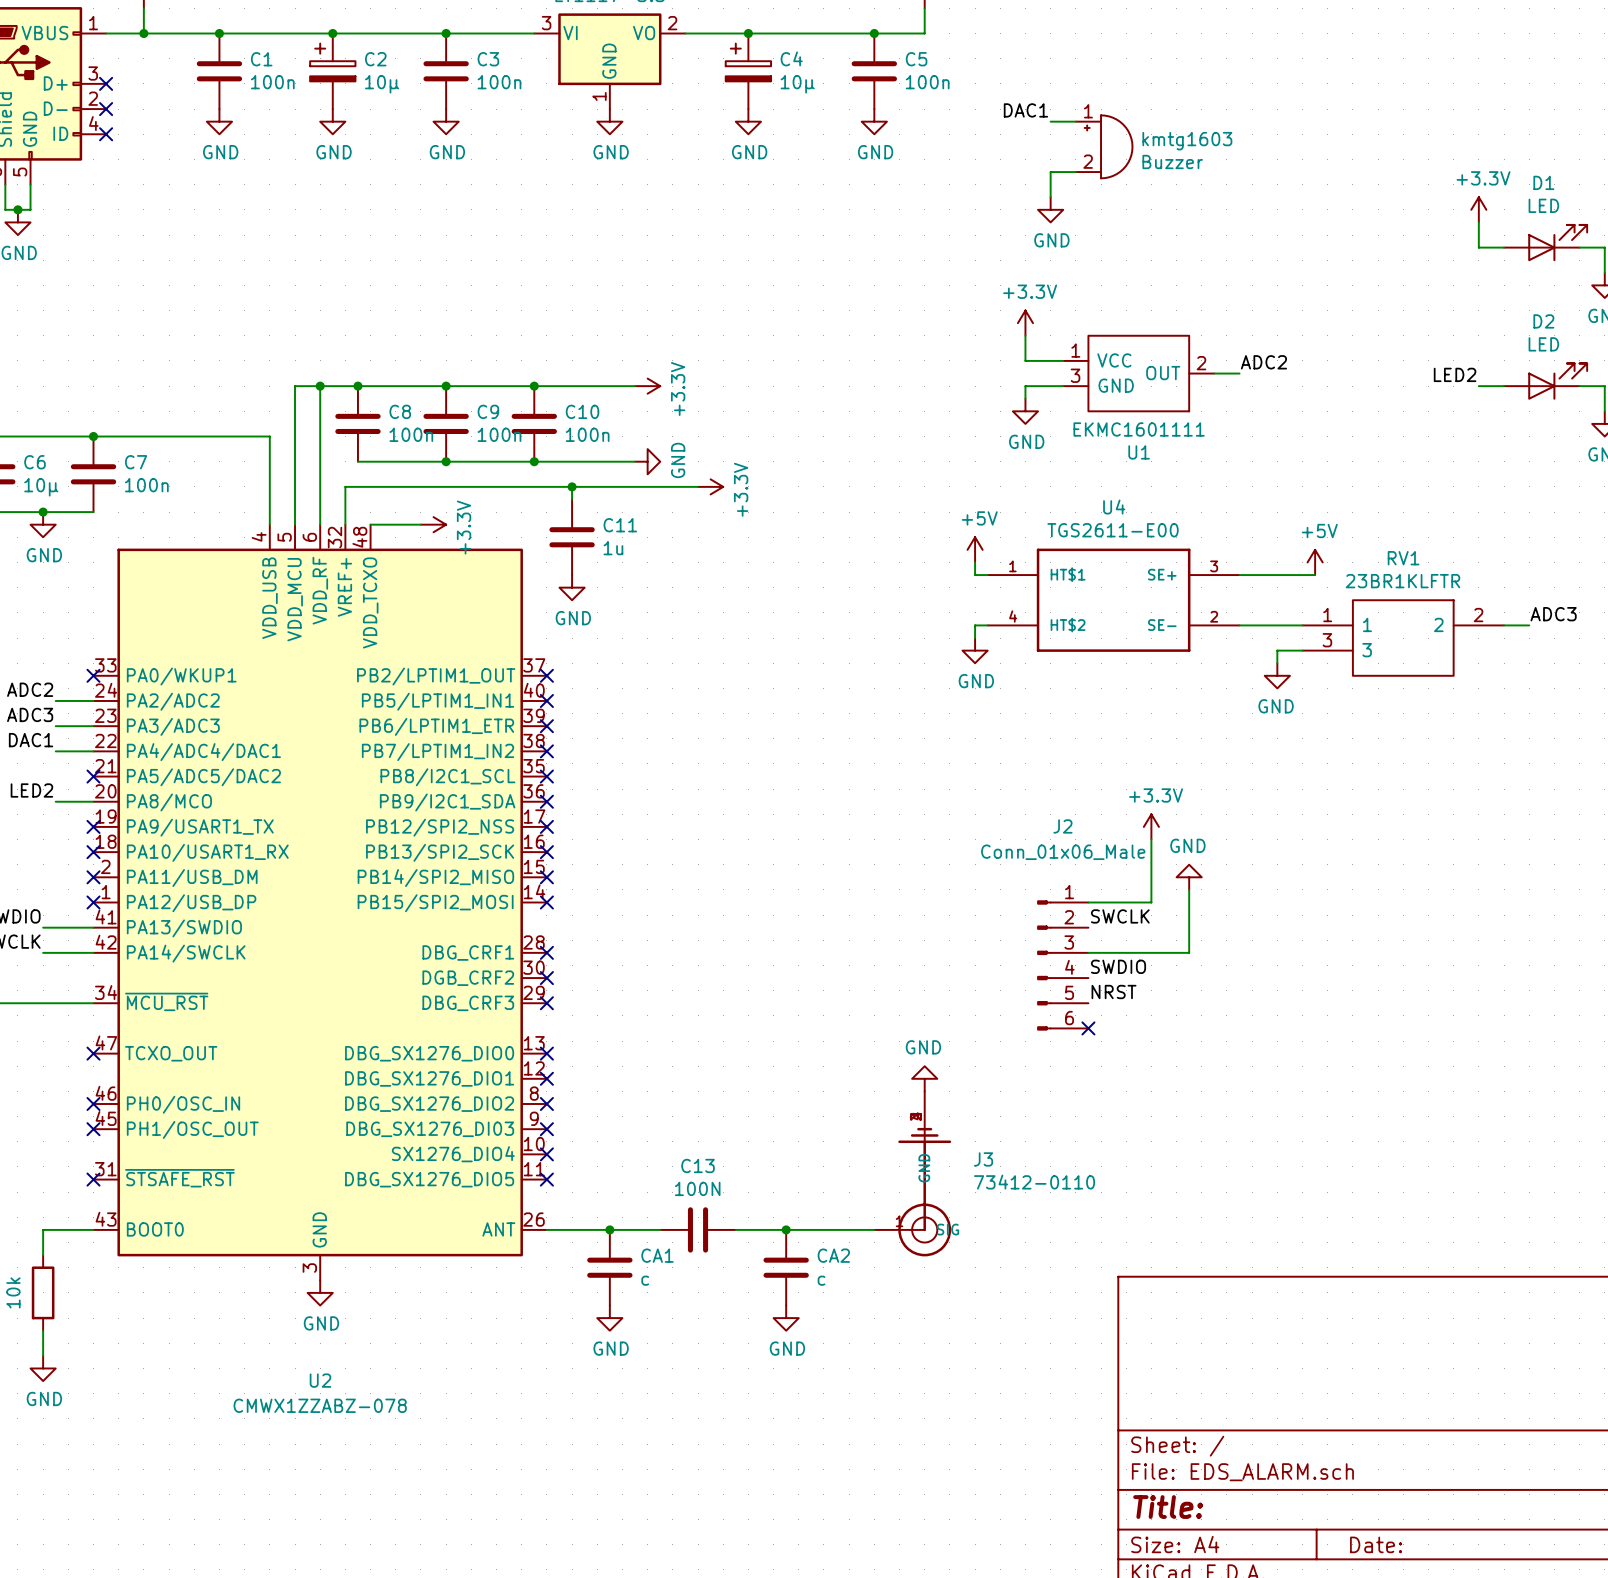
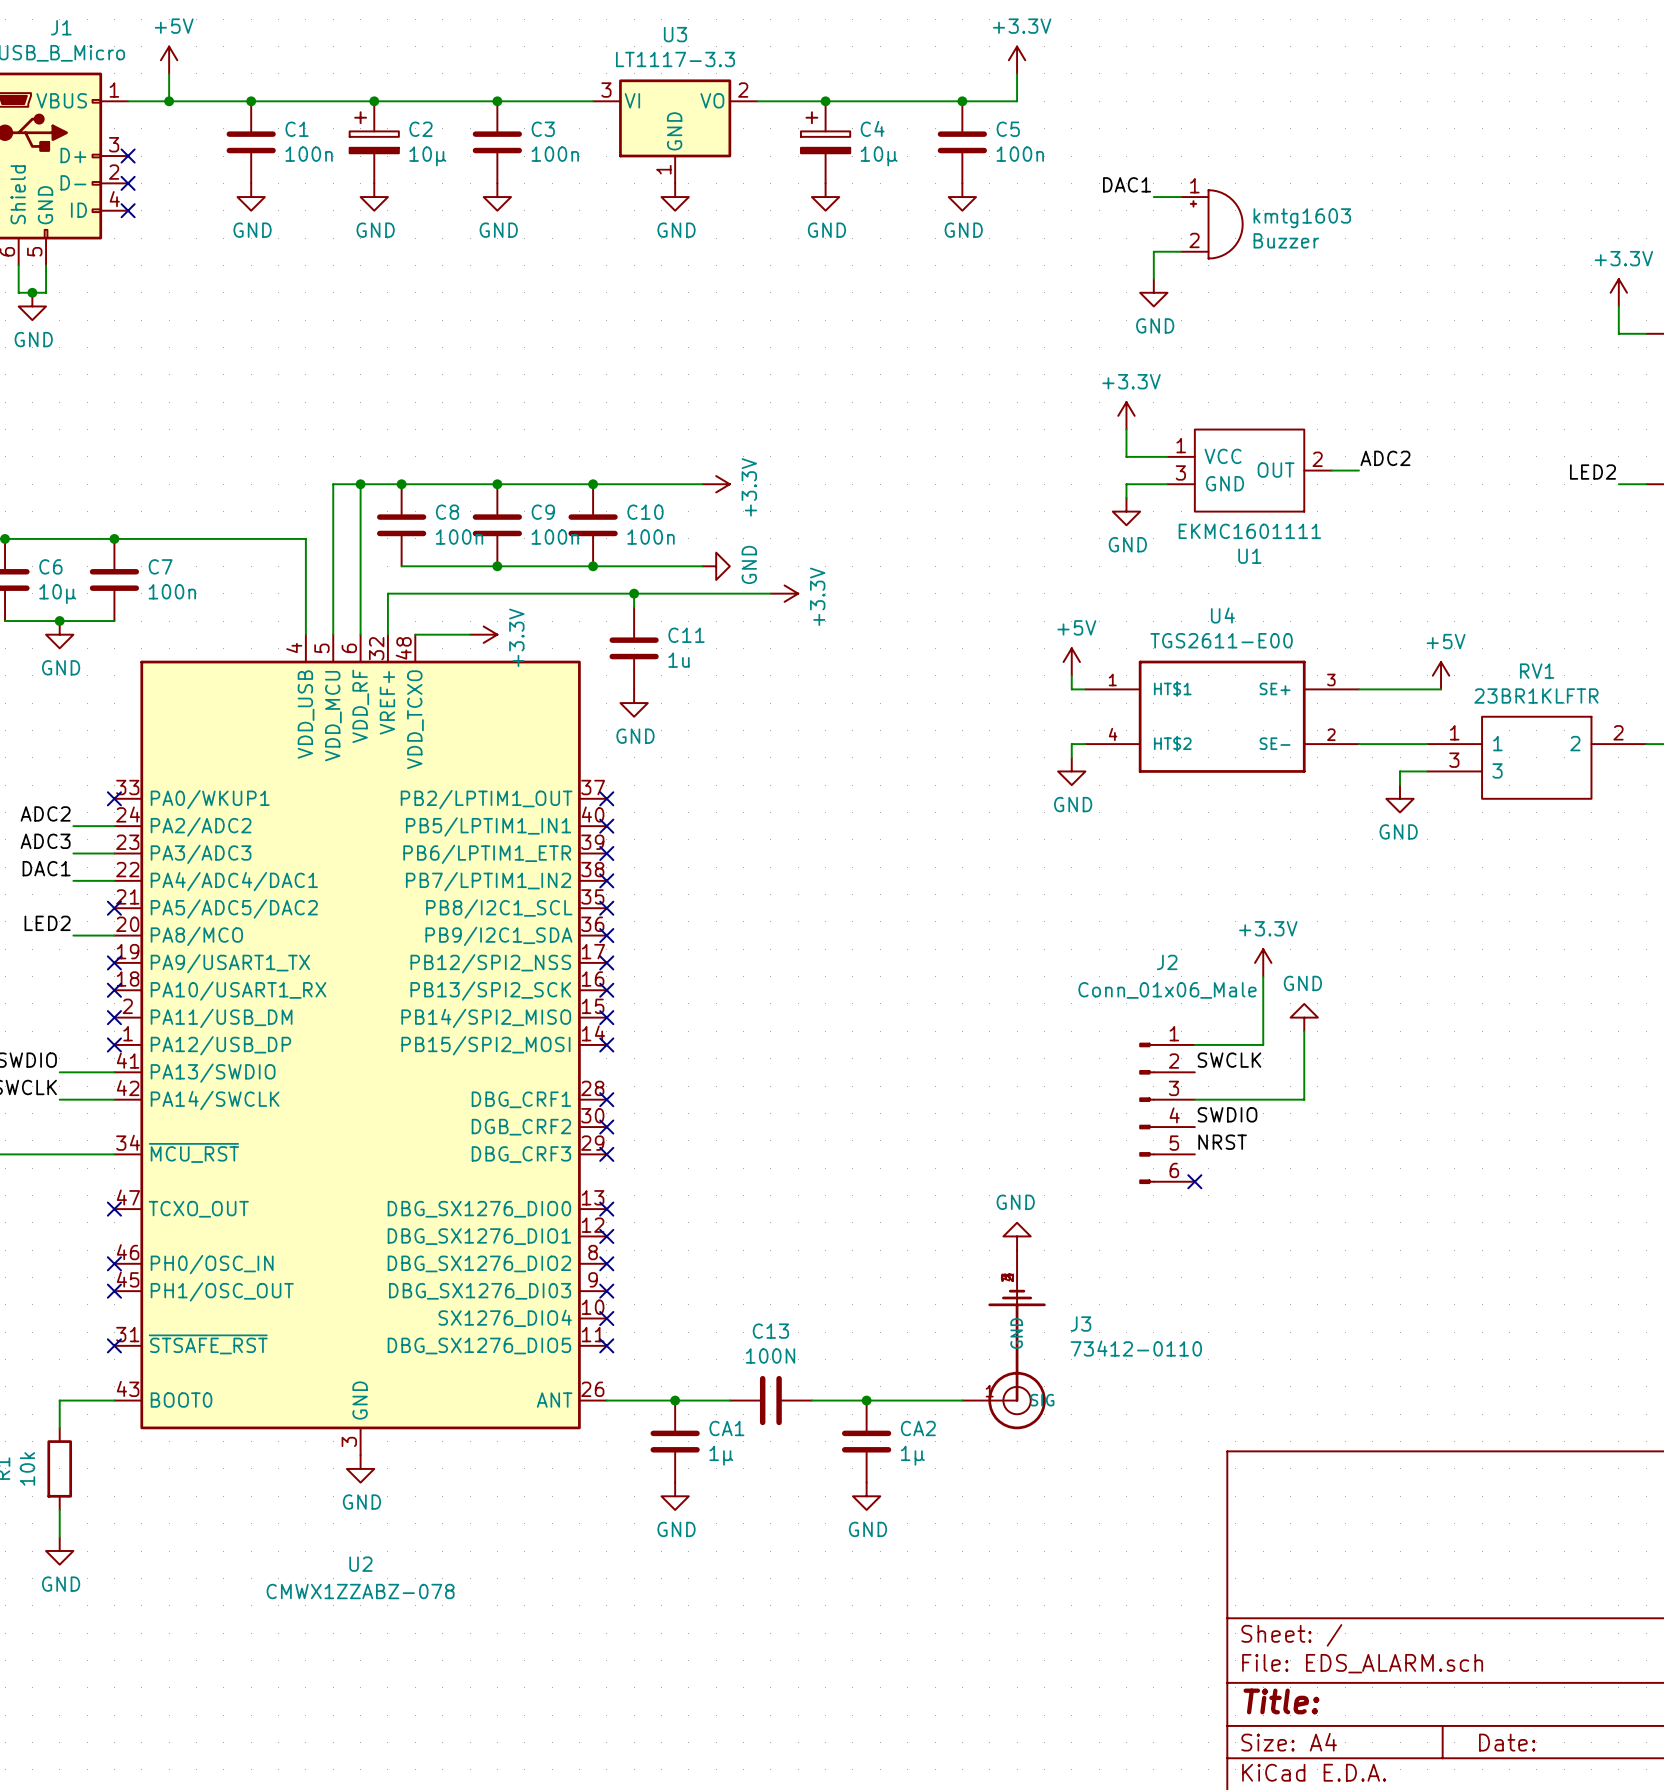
CA1 value: c (645, 1280) -> 1µ (721, 1455)
CA2 value: c (821, 1280) -> 1µ (912, 1455)

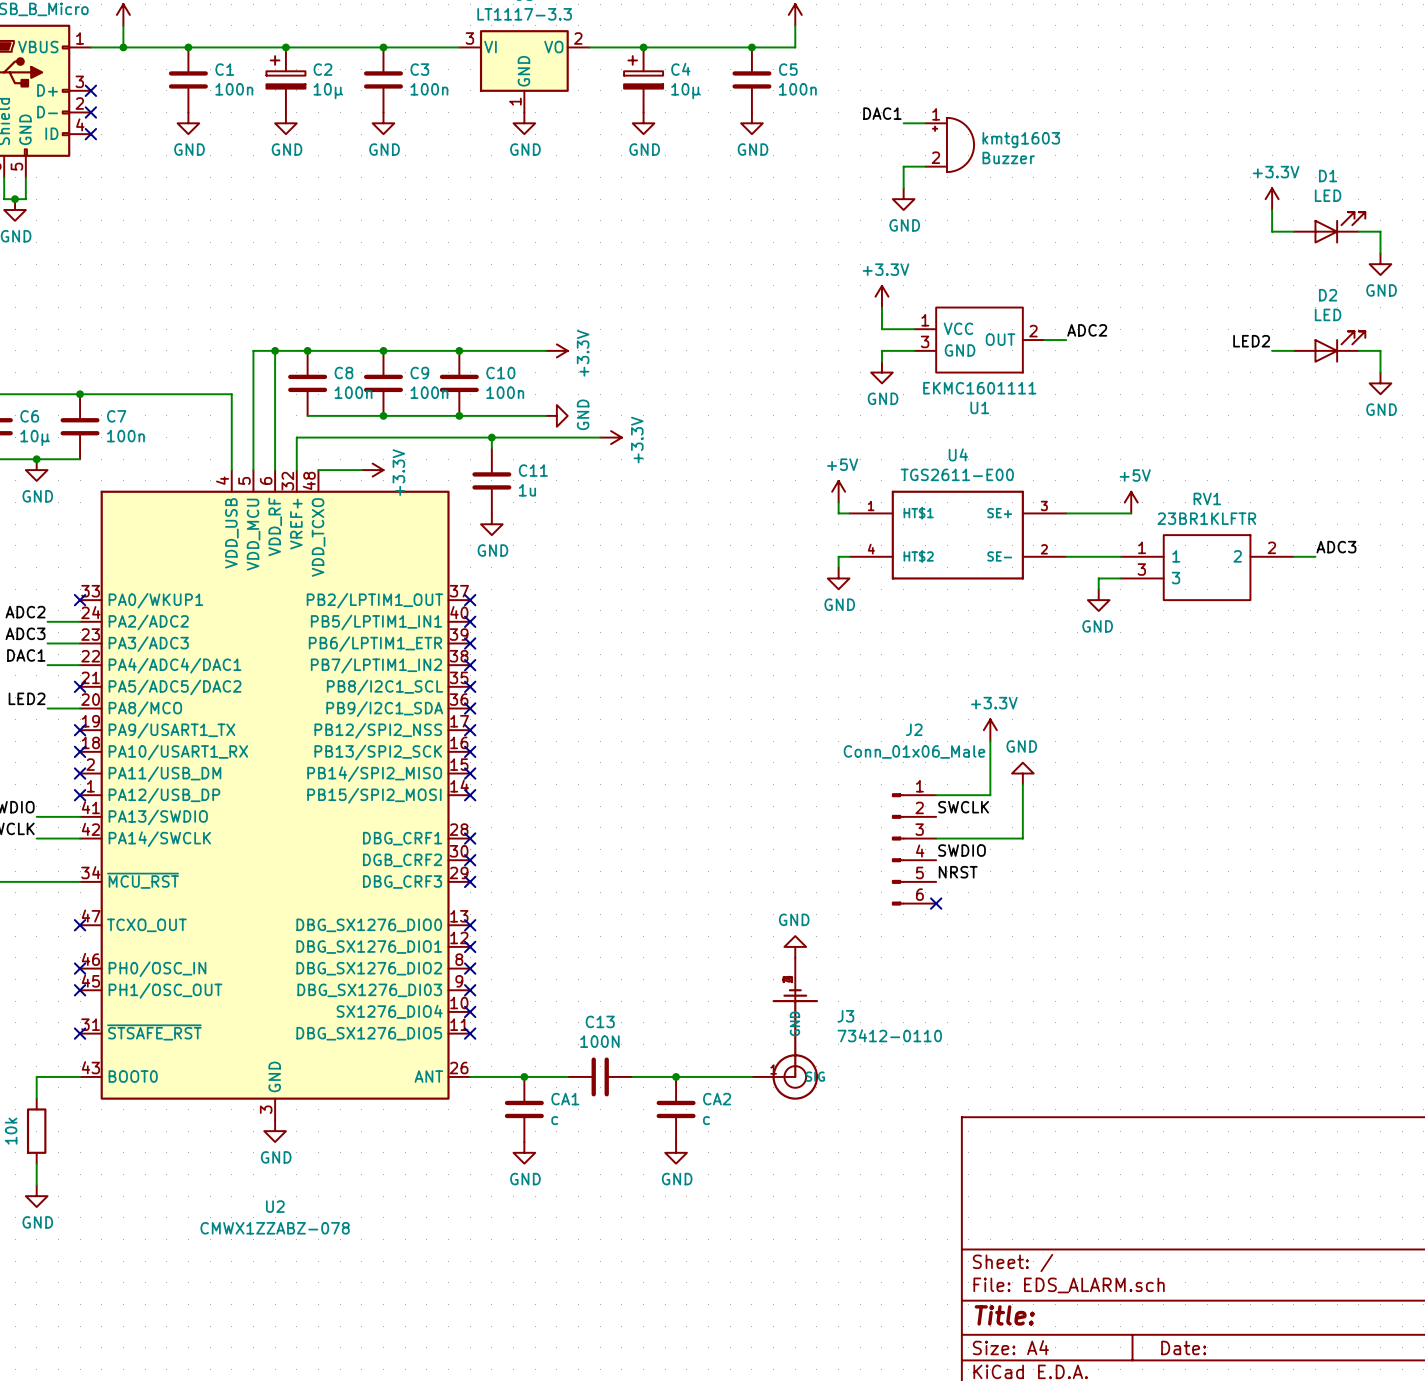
CA1 value: 1µ (721, 1455) -> c (554, 1120)
CA2 value: 1µ (912, 1455) -> c (706, 1120)

